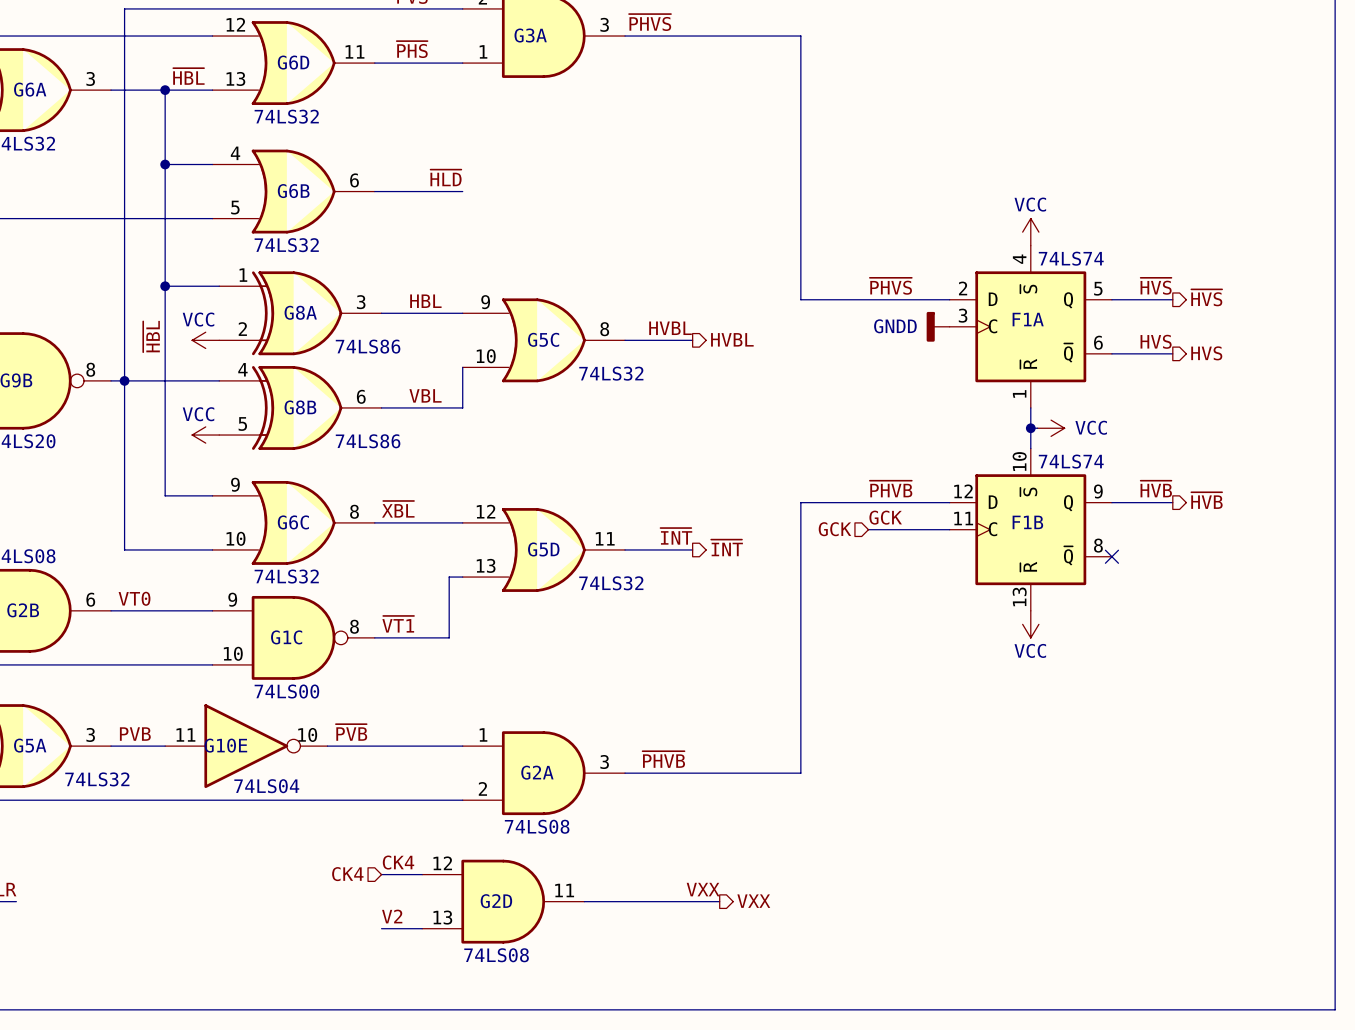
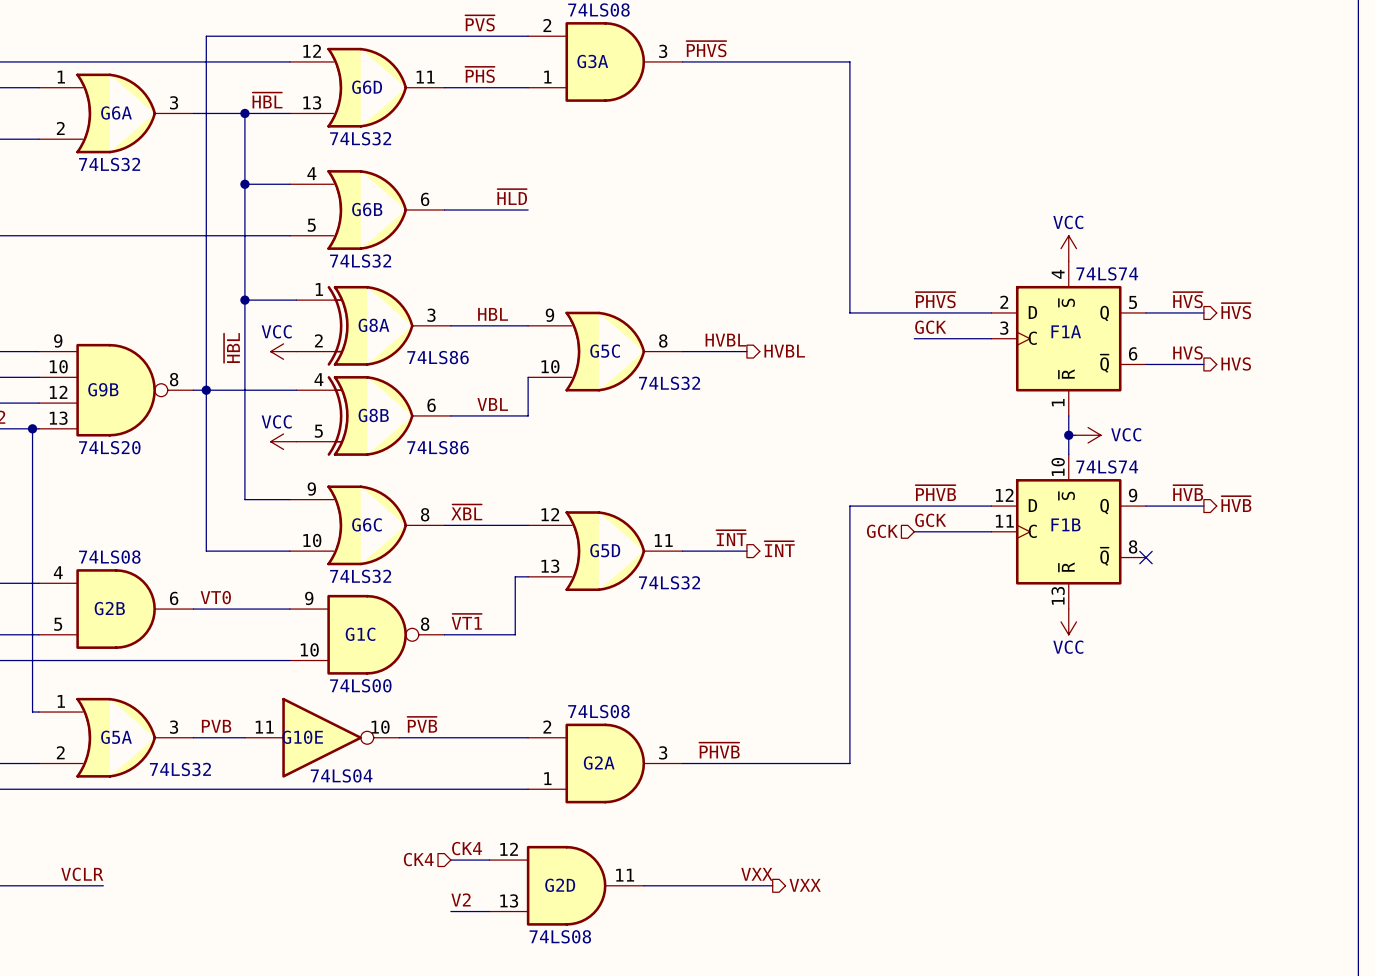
label: none -> GCK (930, 327)
wire: none -> (914, 338) (991, 338)
power symbol: GNDD (938, 326) -> none
G2A flip: as is (543, 773) -> up-down (605, 763)

